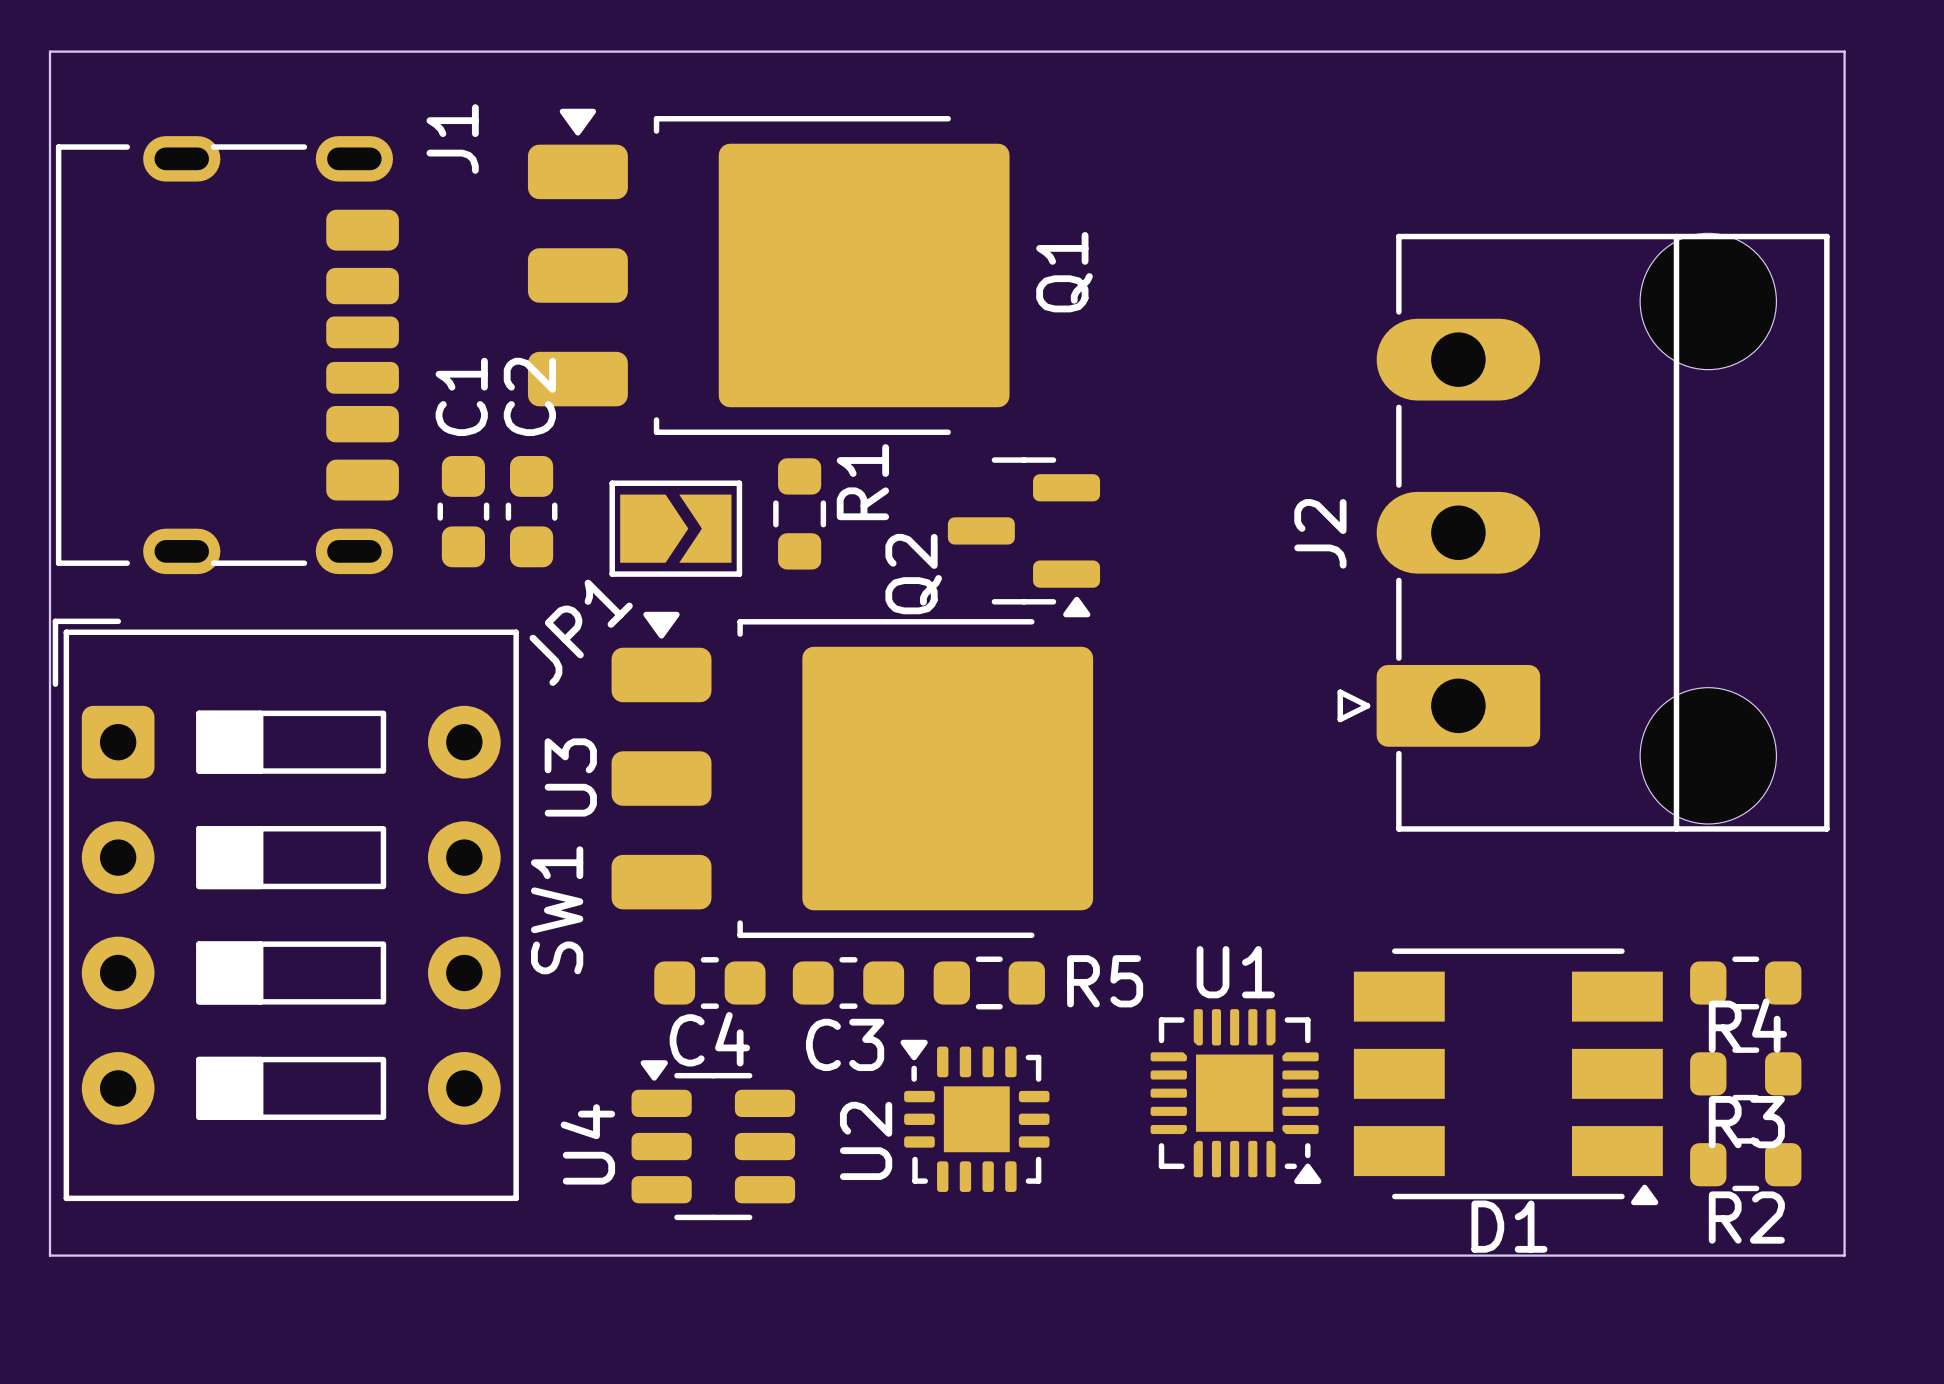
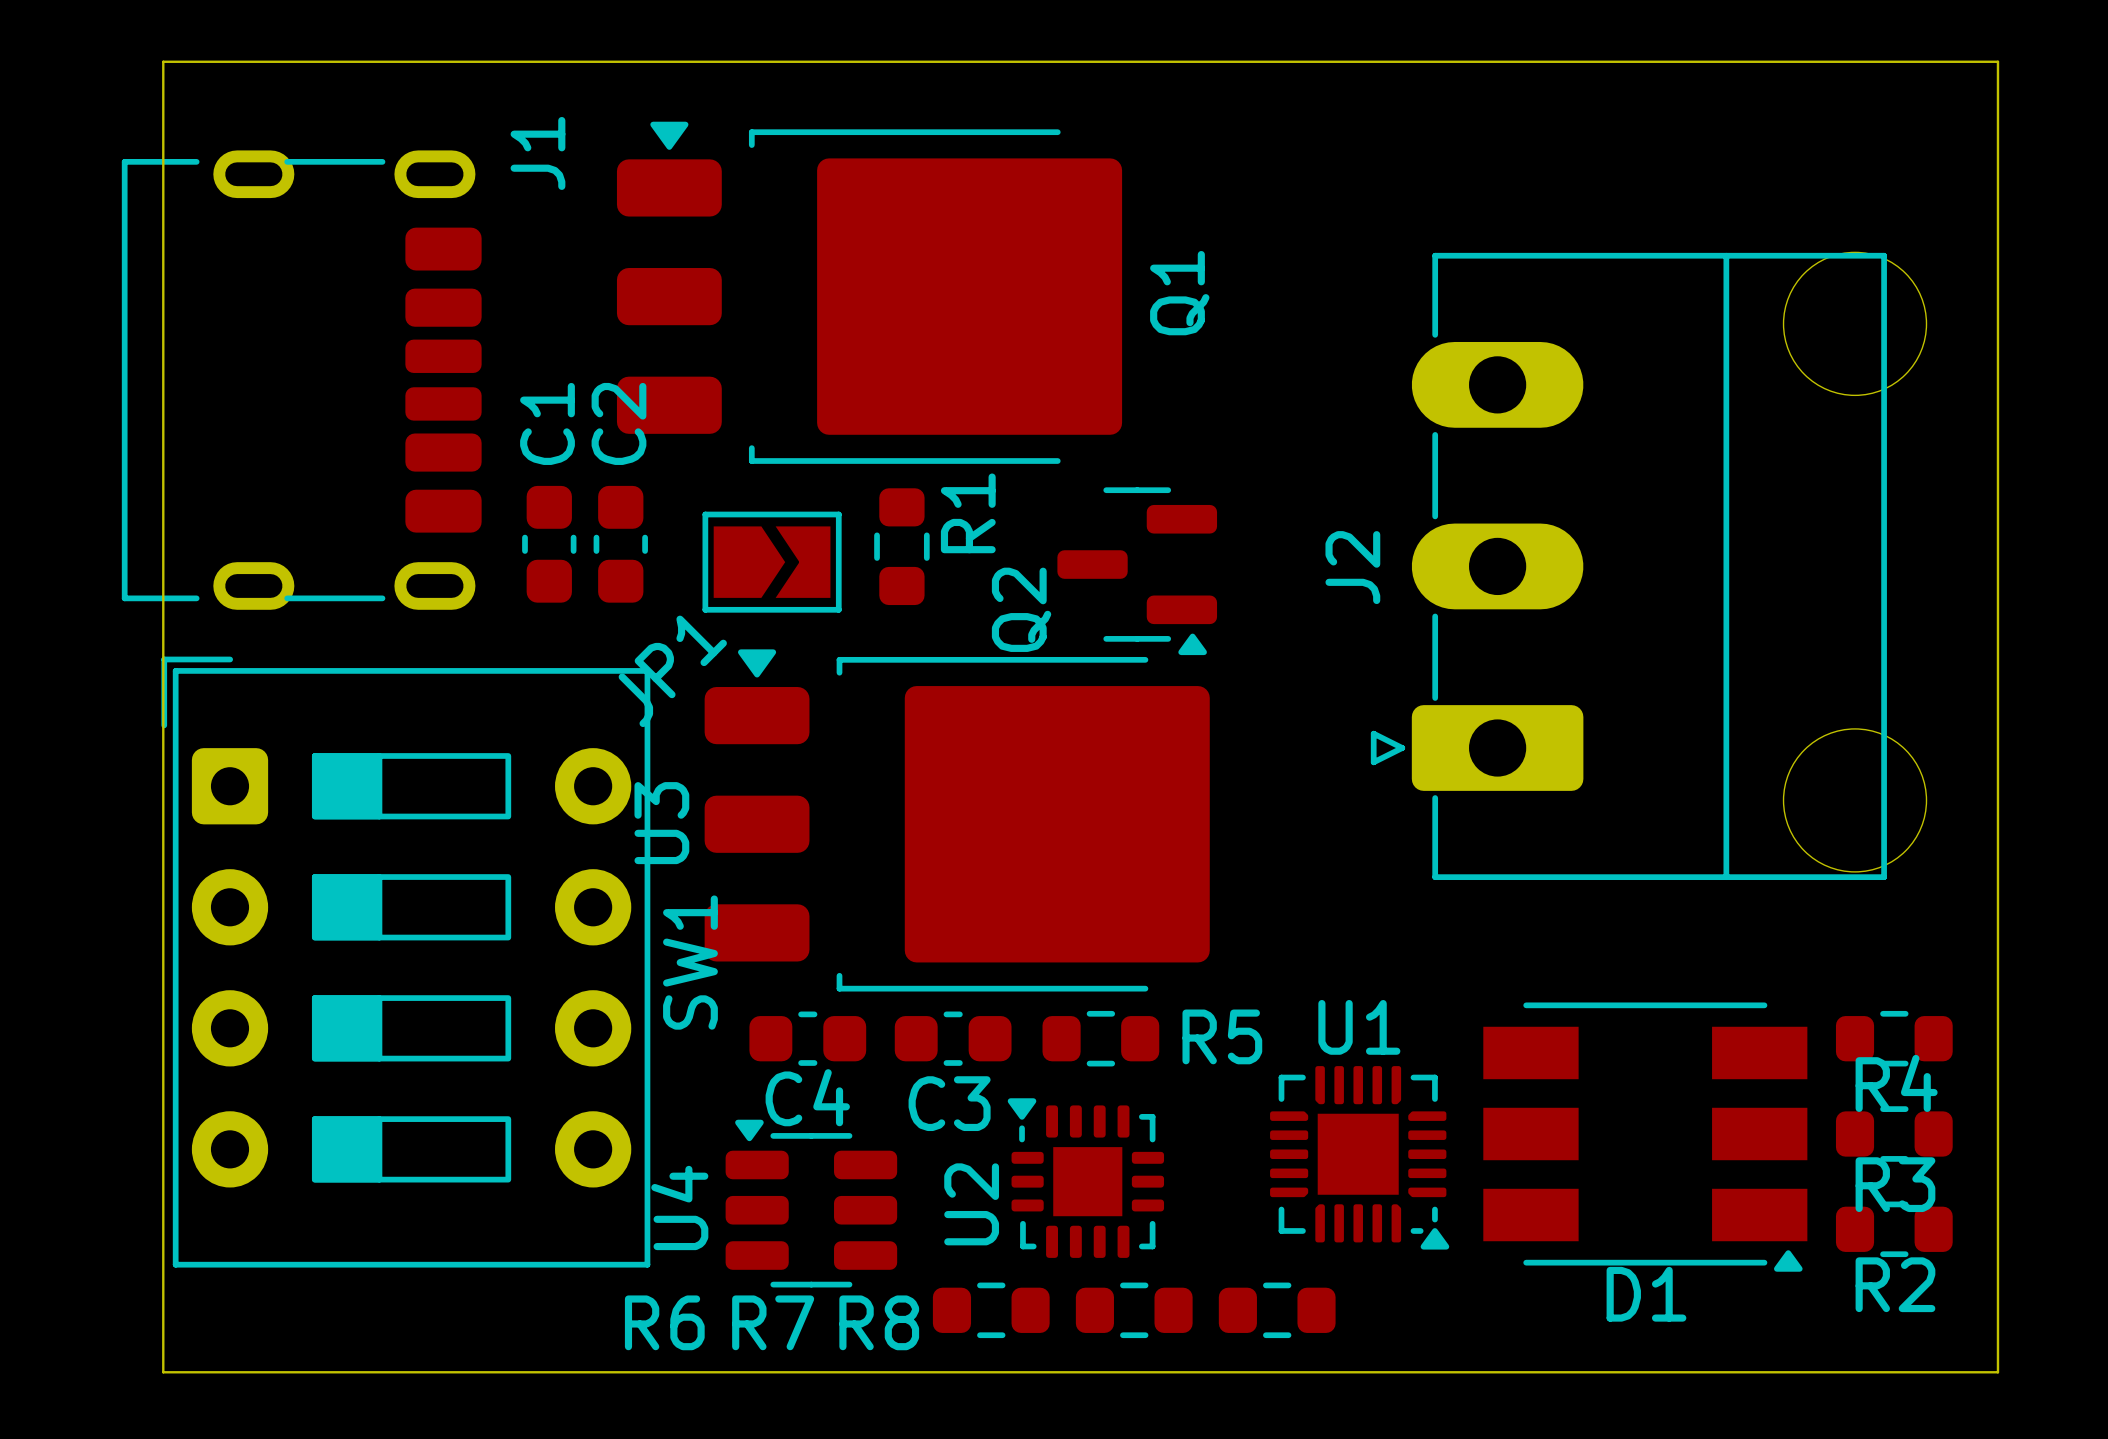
board edge: (95, 51) (49, 51) (49, 1255) (1844, 1255) -> (163, 61) (163, 1372) (1997, 1372) (1997, 1324)
J2 position: (1583, 532) -> (1628, 566)
SW1 position: (285, 909) -> (405, 962)
R6: none -> (991, 1310)
R7: none -> (1134, 1310)
R8: none -> (1277, 1310)

